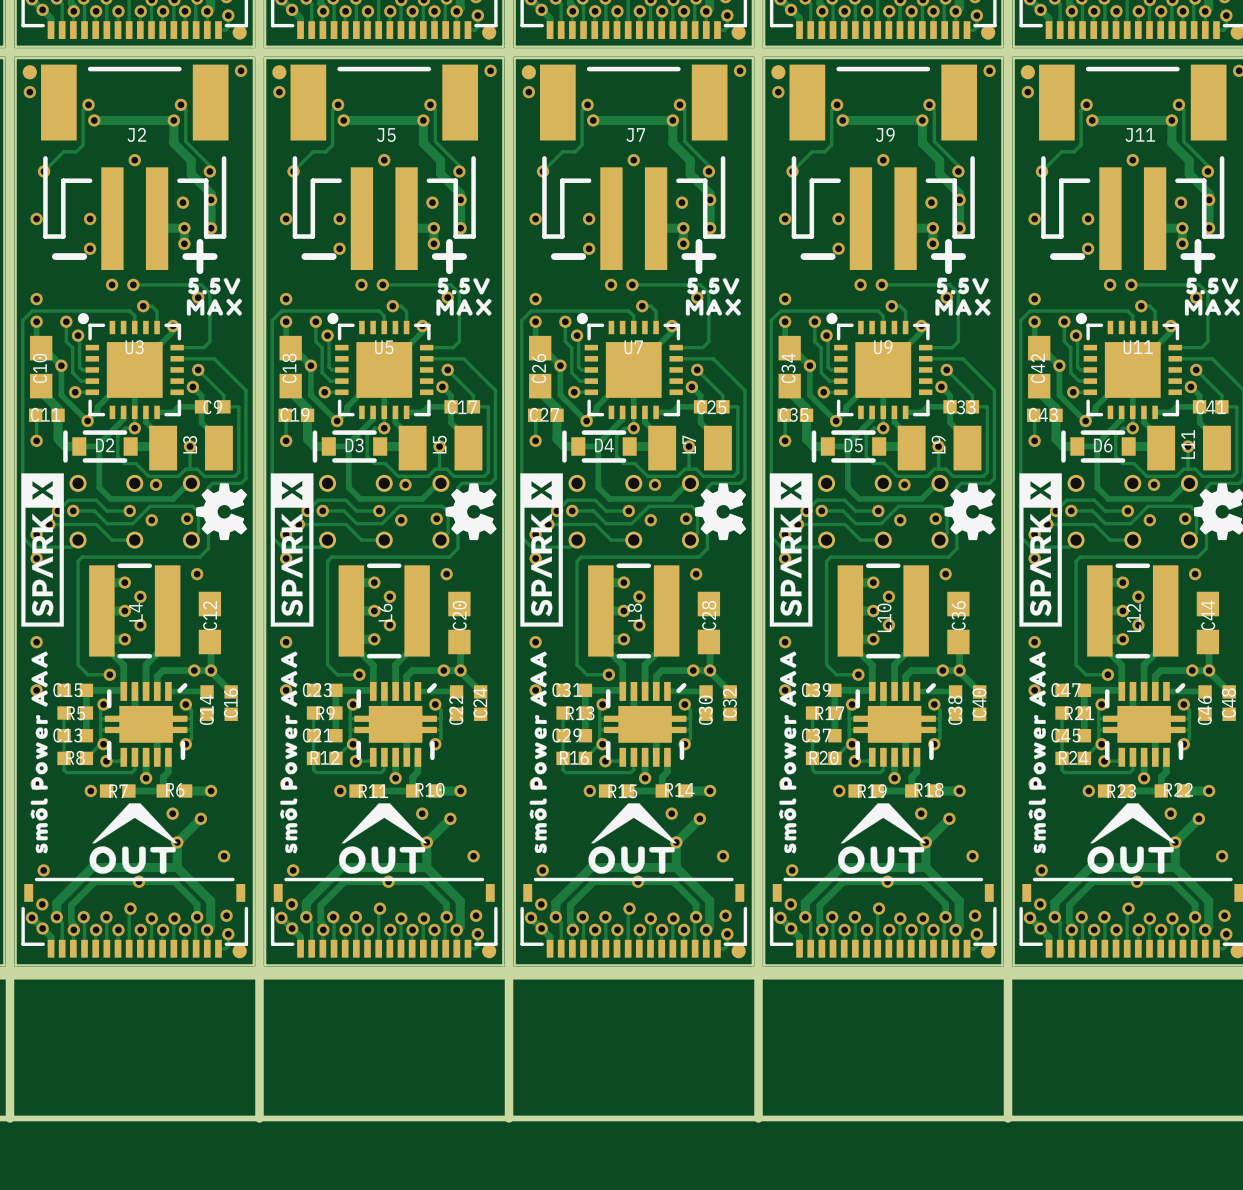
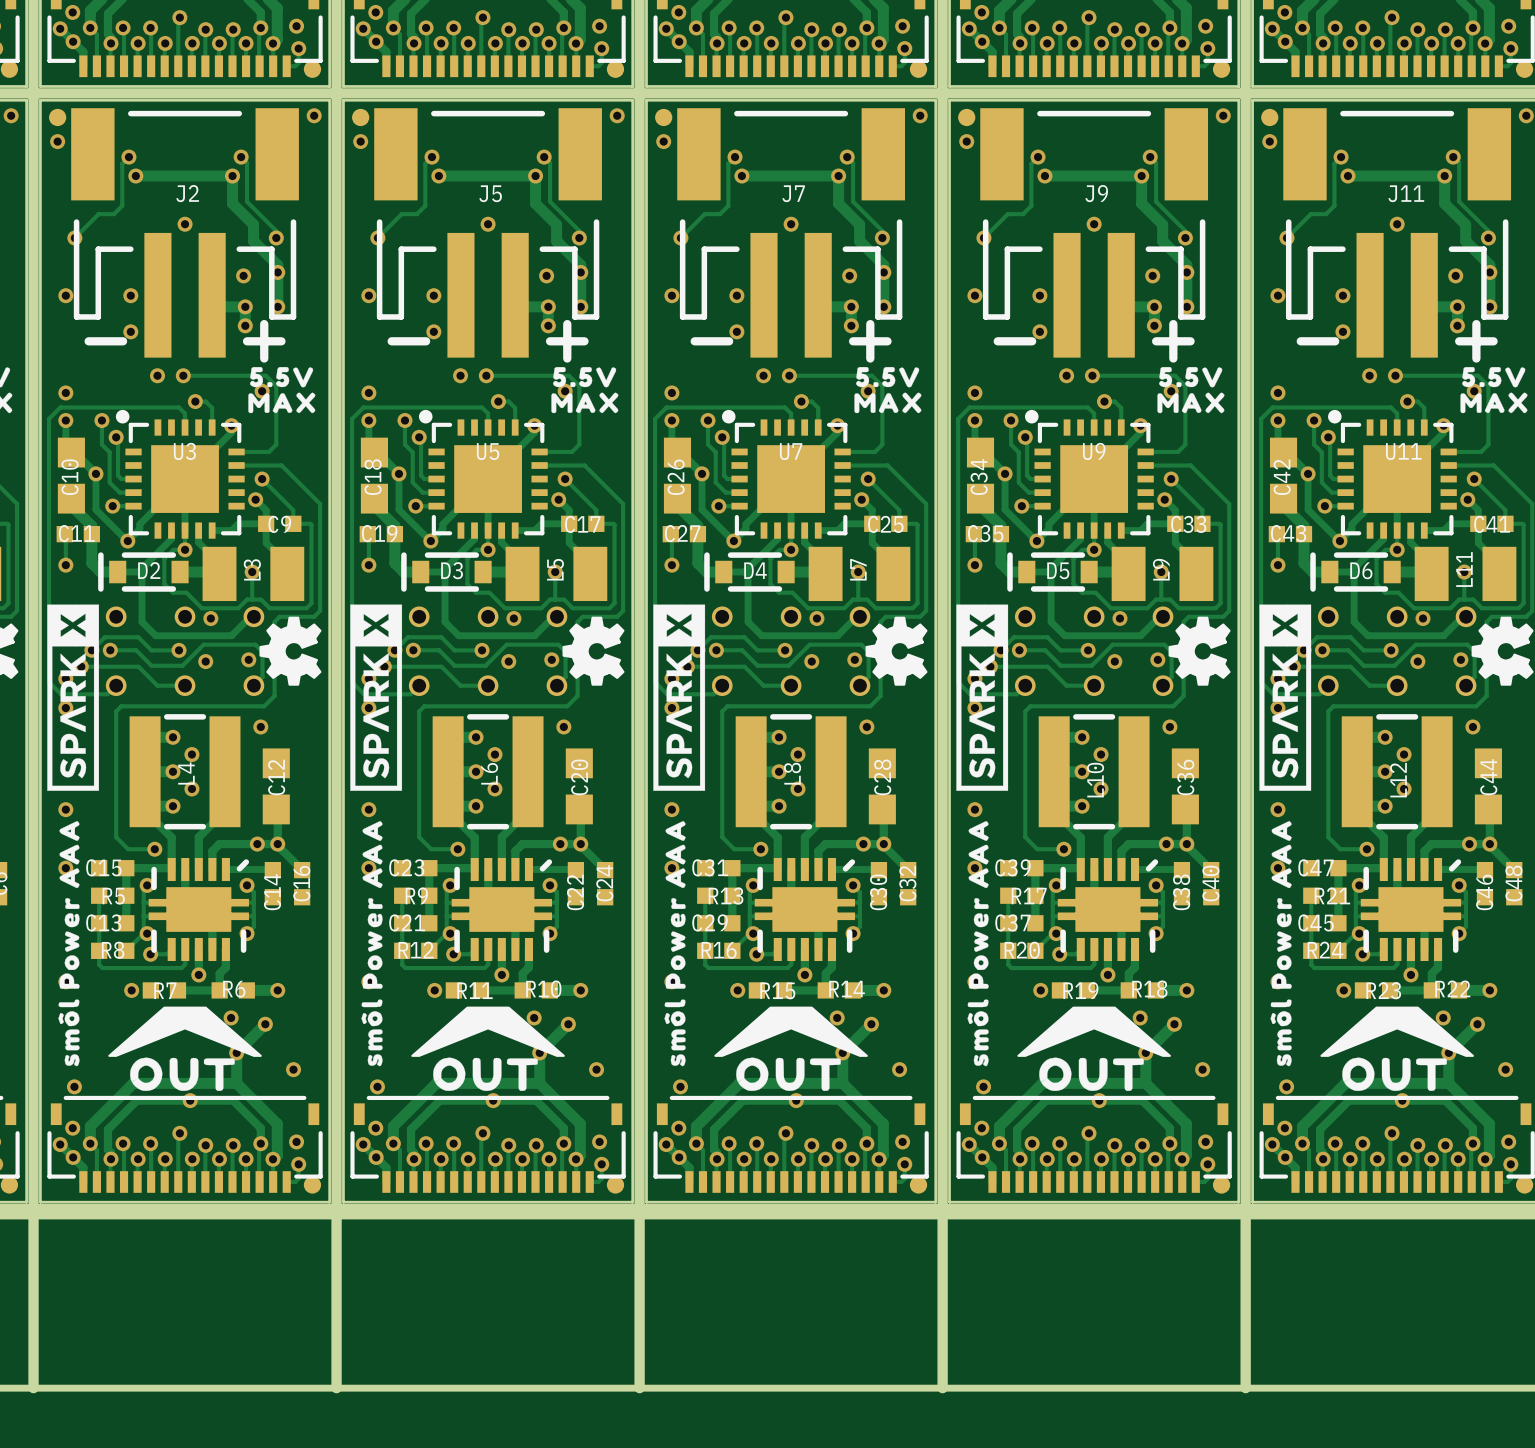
drawing shape: [92, 803, 178, 844] -> [108, 1006, 262, 1057]
drawing shape: [341, 803, 428, 844] -> [411, 1006, 565, 1057]
drawing shape: [591, 803, 677, 844] -> [714, 1006, 868, 1057]
drawing shape: [840, 803, 927, 844] -> [1017, 1006, 1171, 1057]
drawing shape: [1090, 803, 1176, 844] -> [1320, 1006, 1474, 1057]

